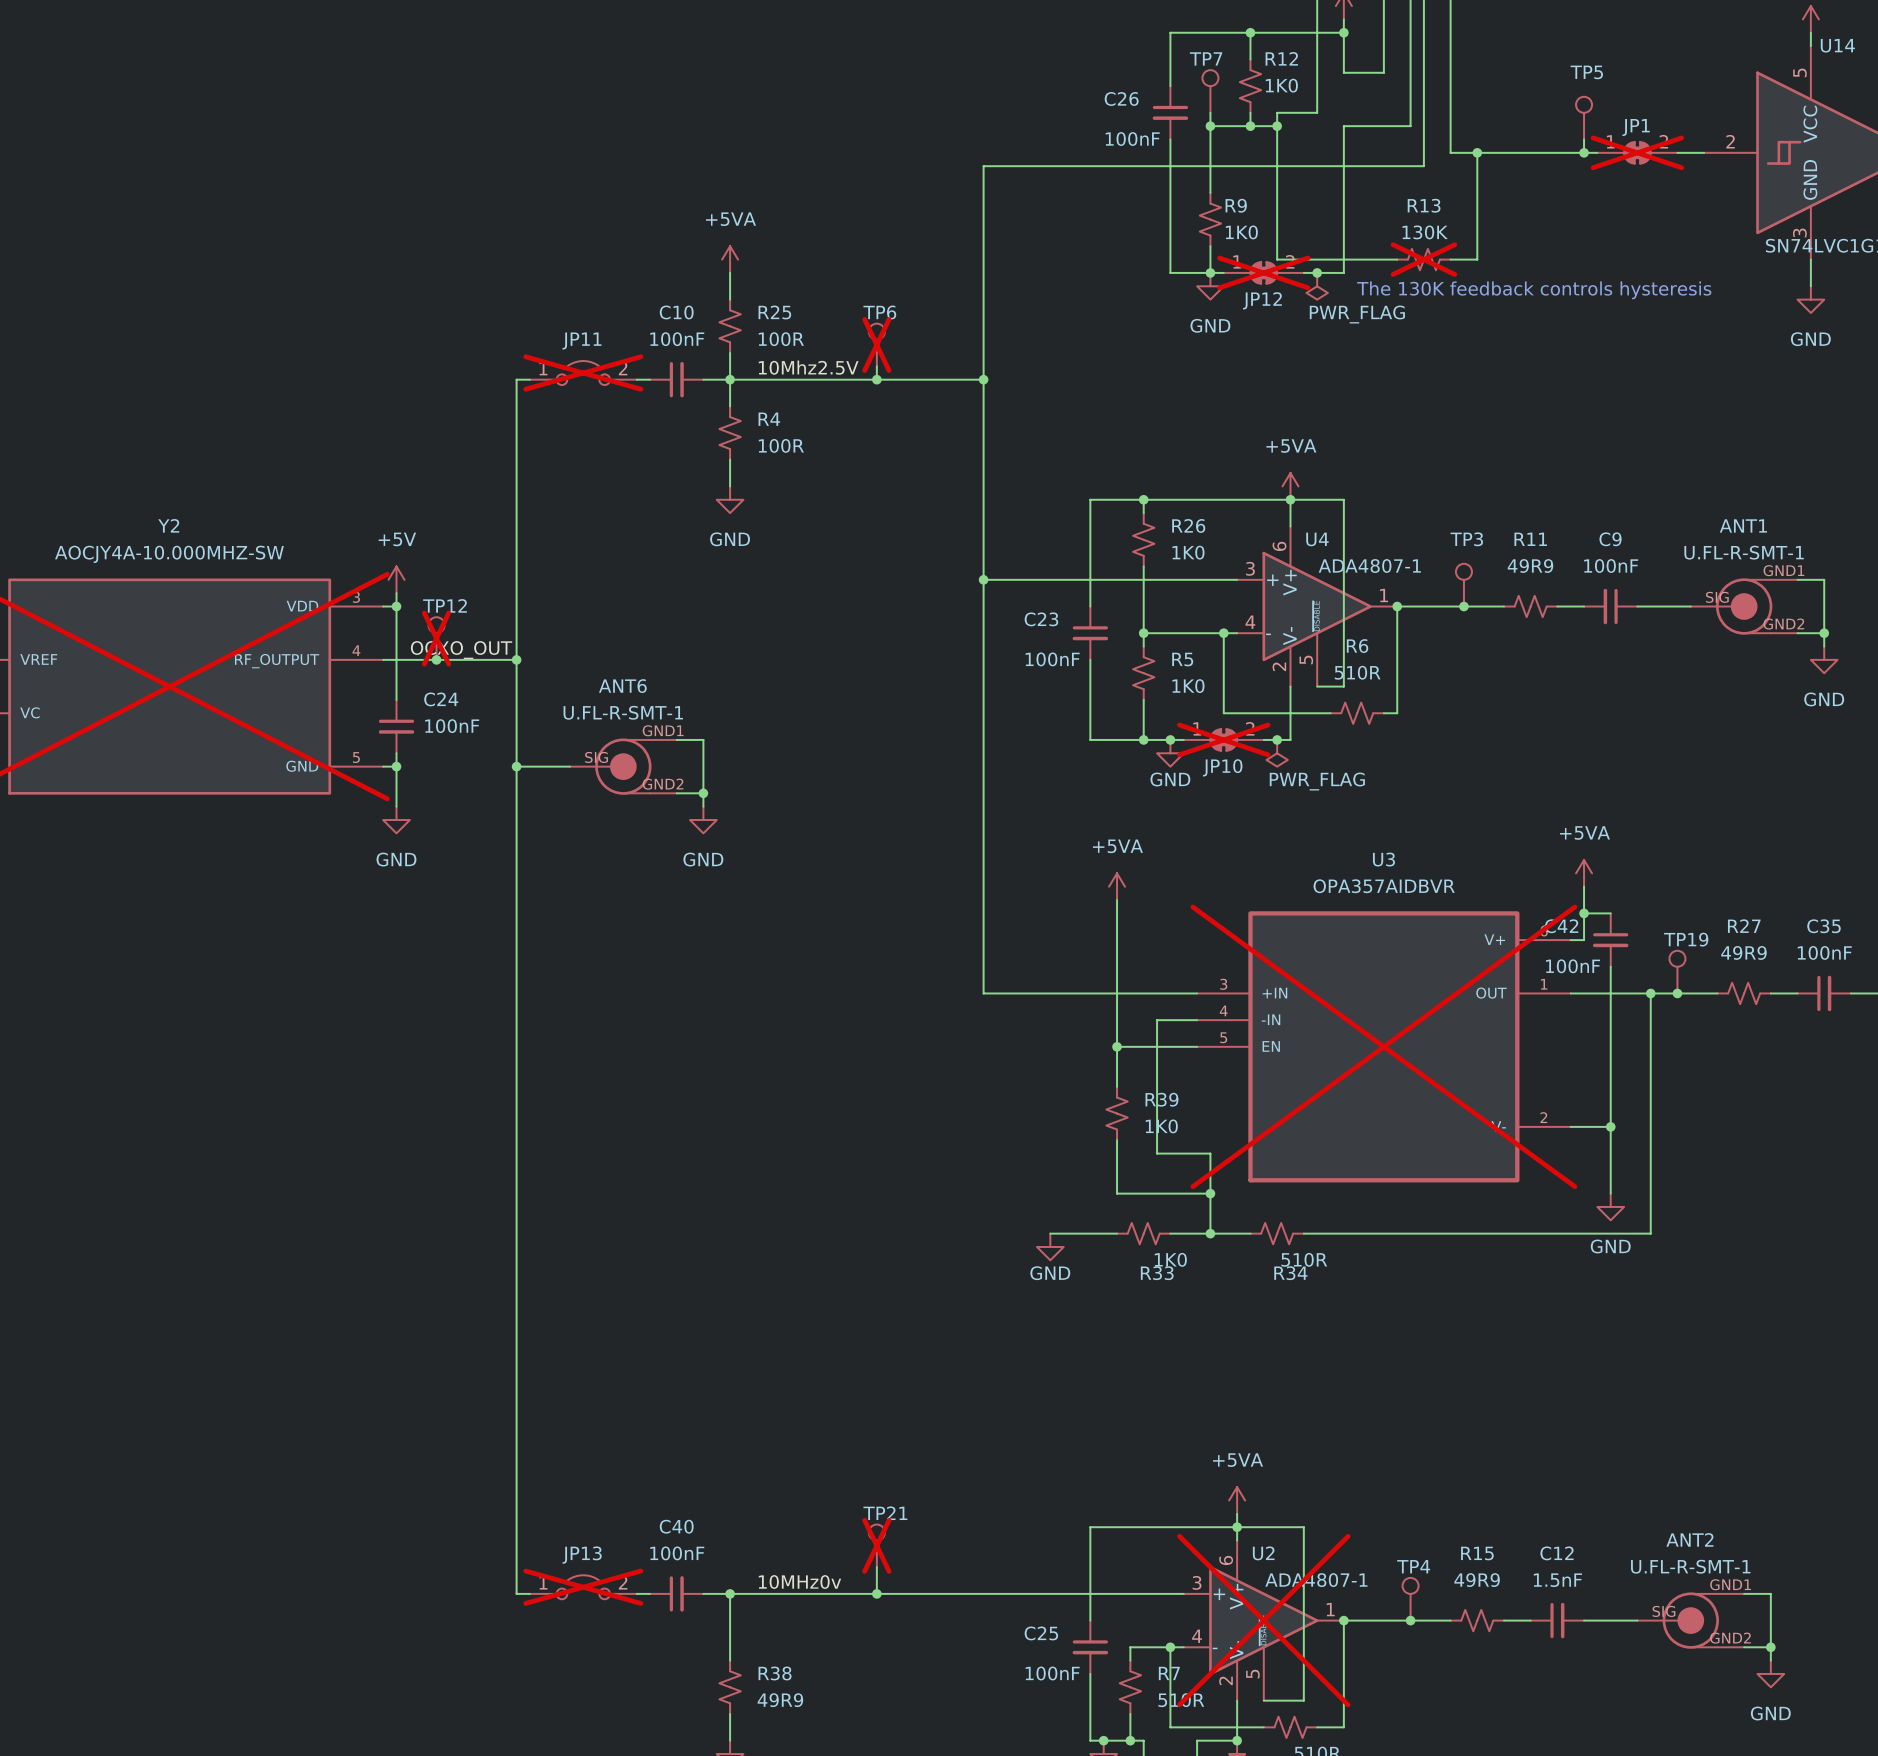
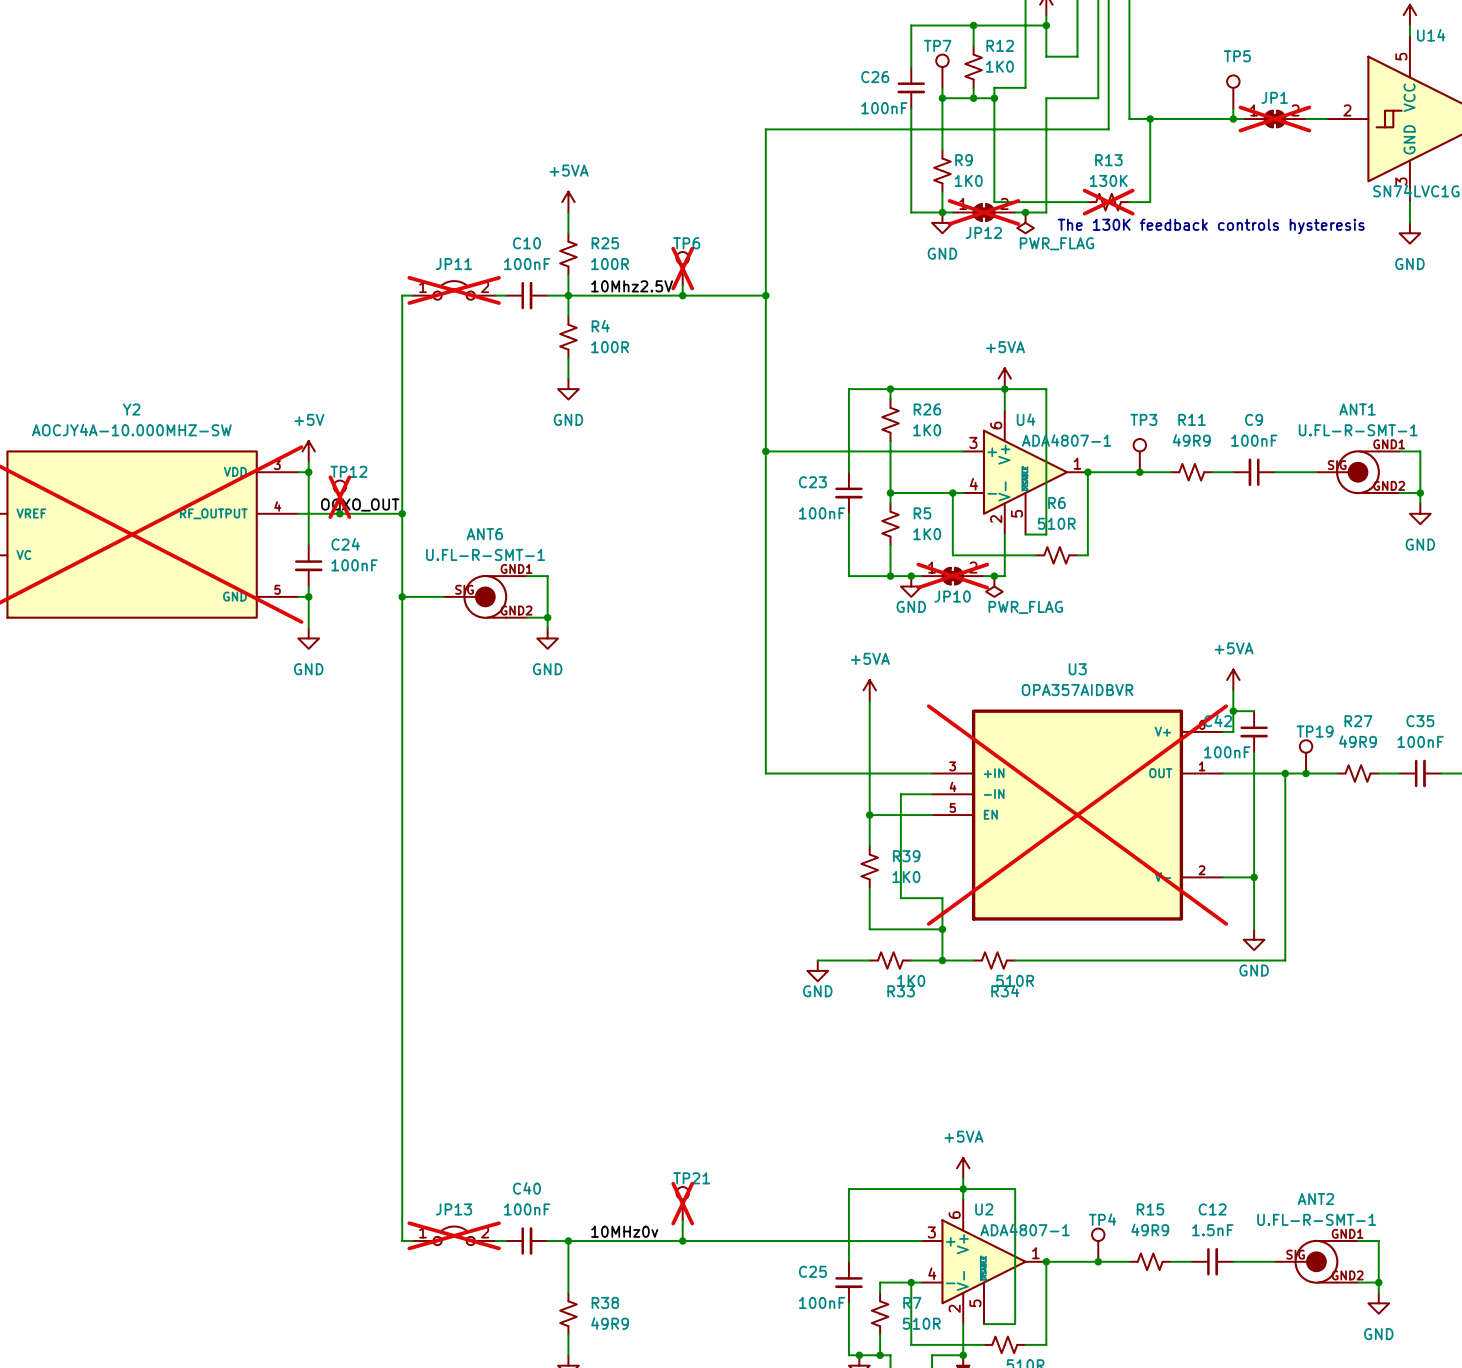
U2 do-not-place cross: (1263, 1620) -> none

